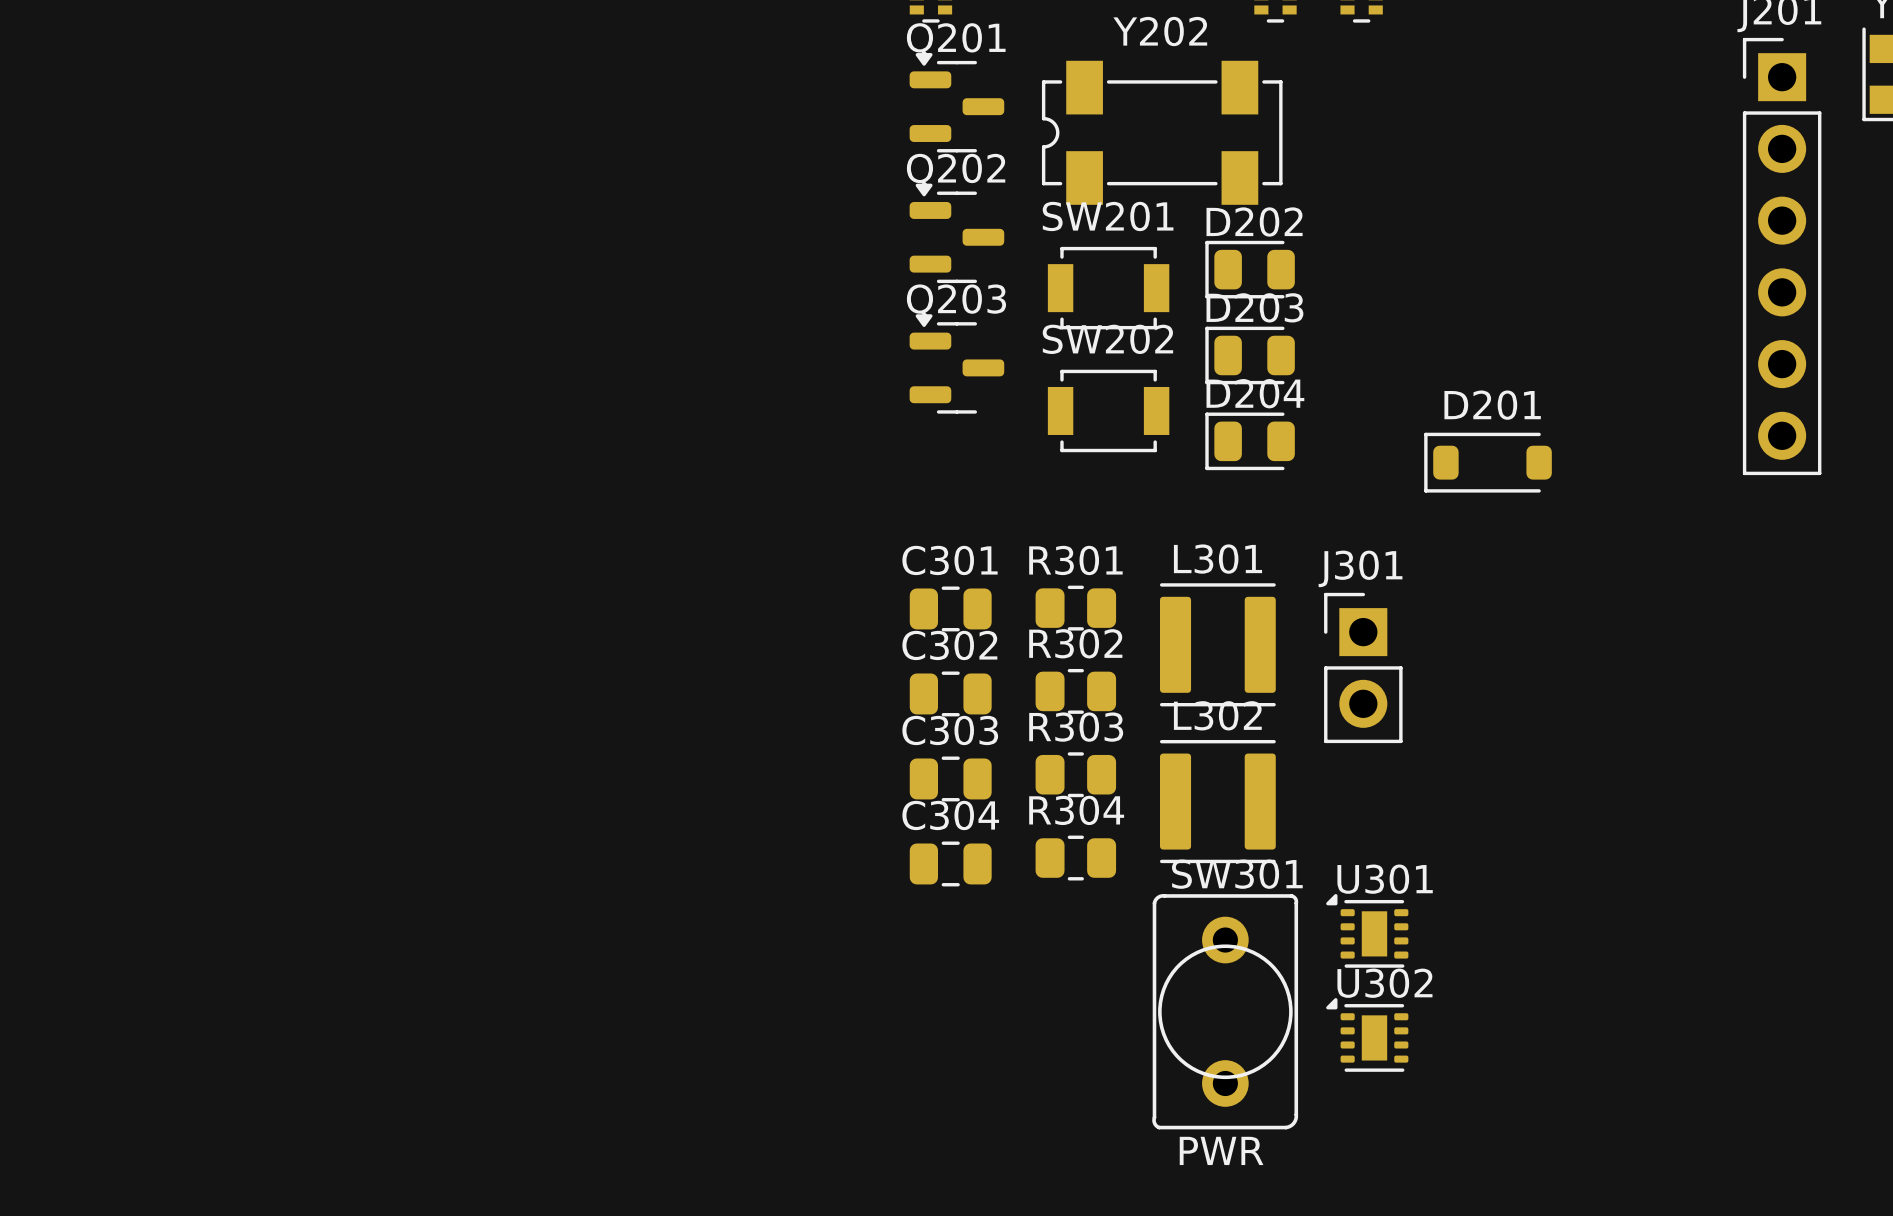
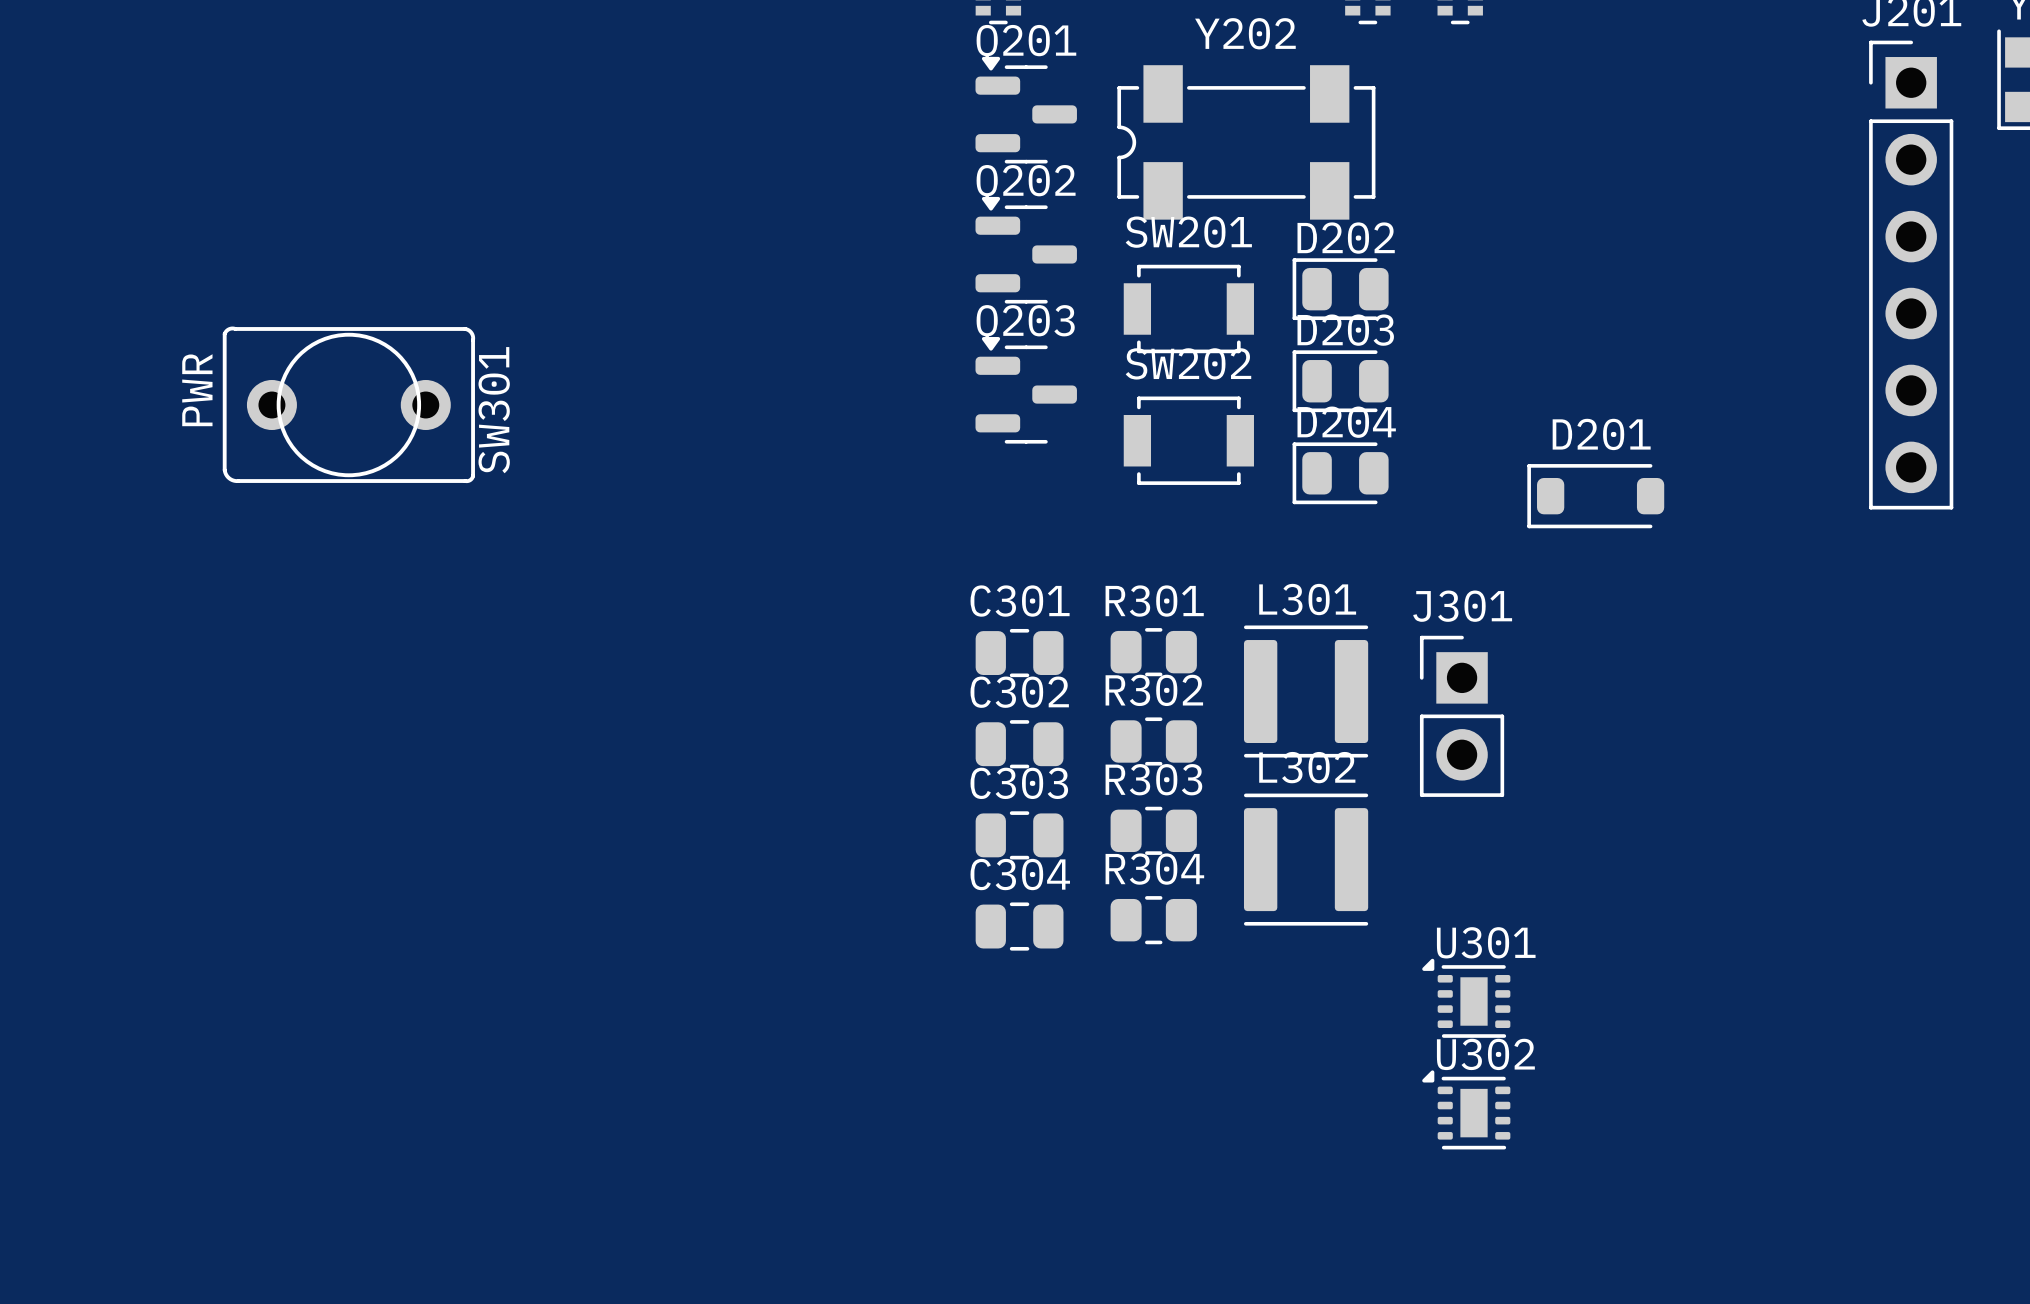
SW301 rotation: 0° (1225, 1011) -> 90° clockwise (348, 404)
SW301 position: (1225, 1011) -> (348, 404)

